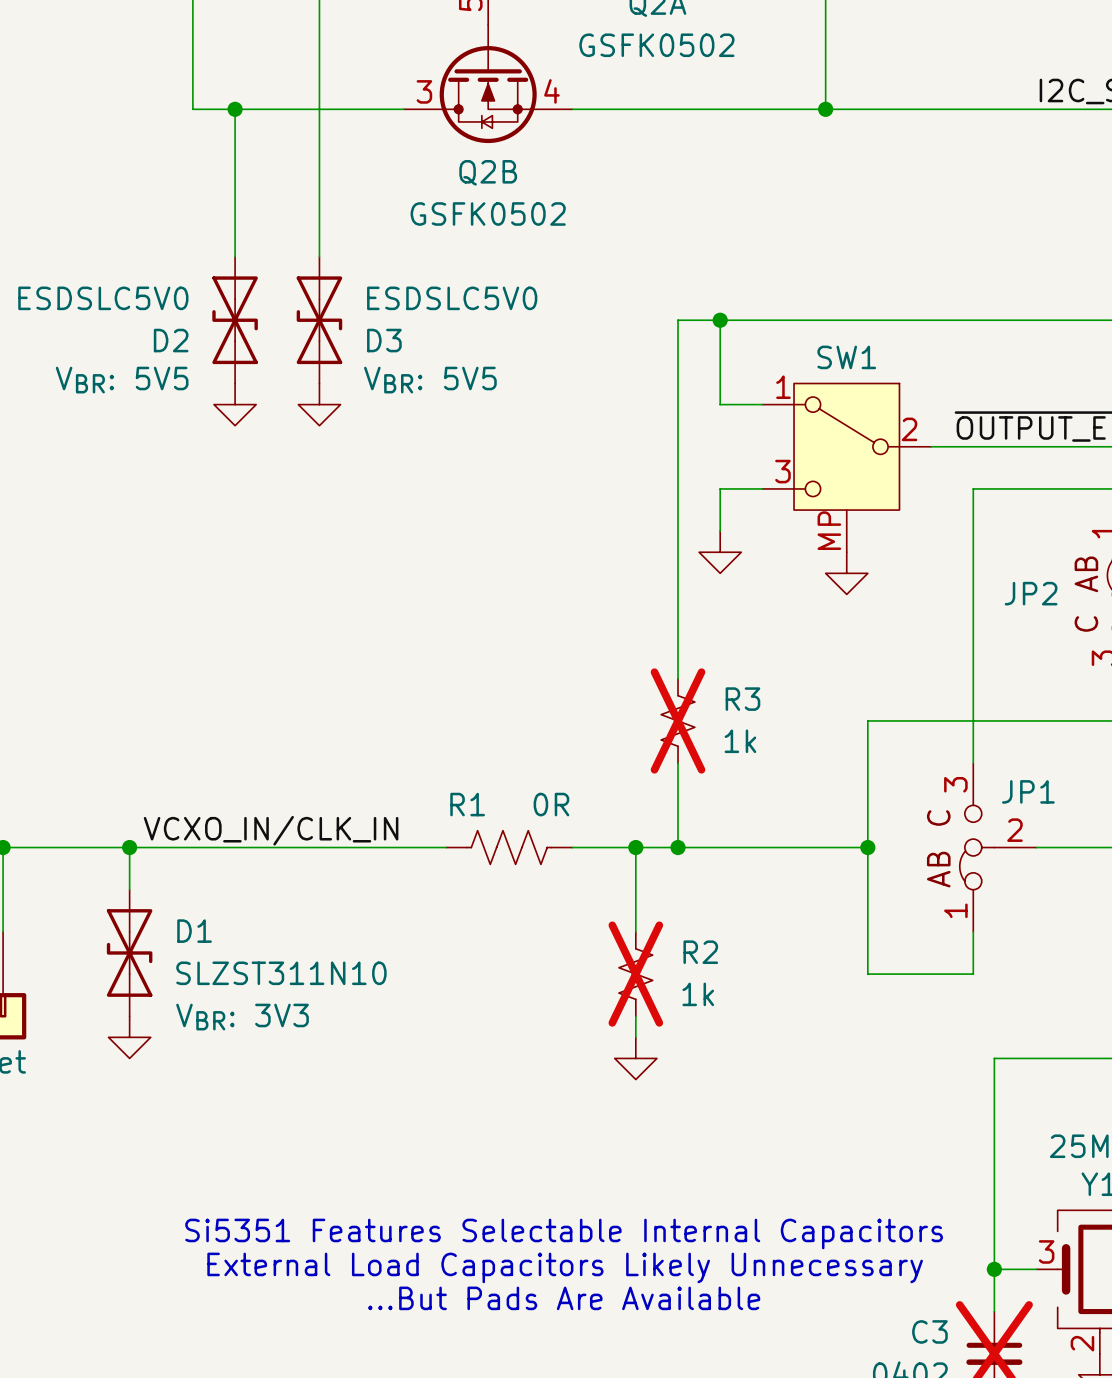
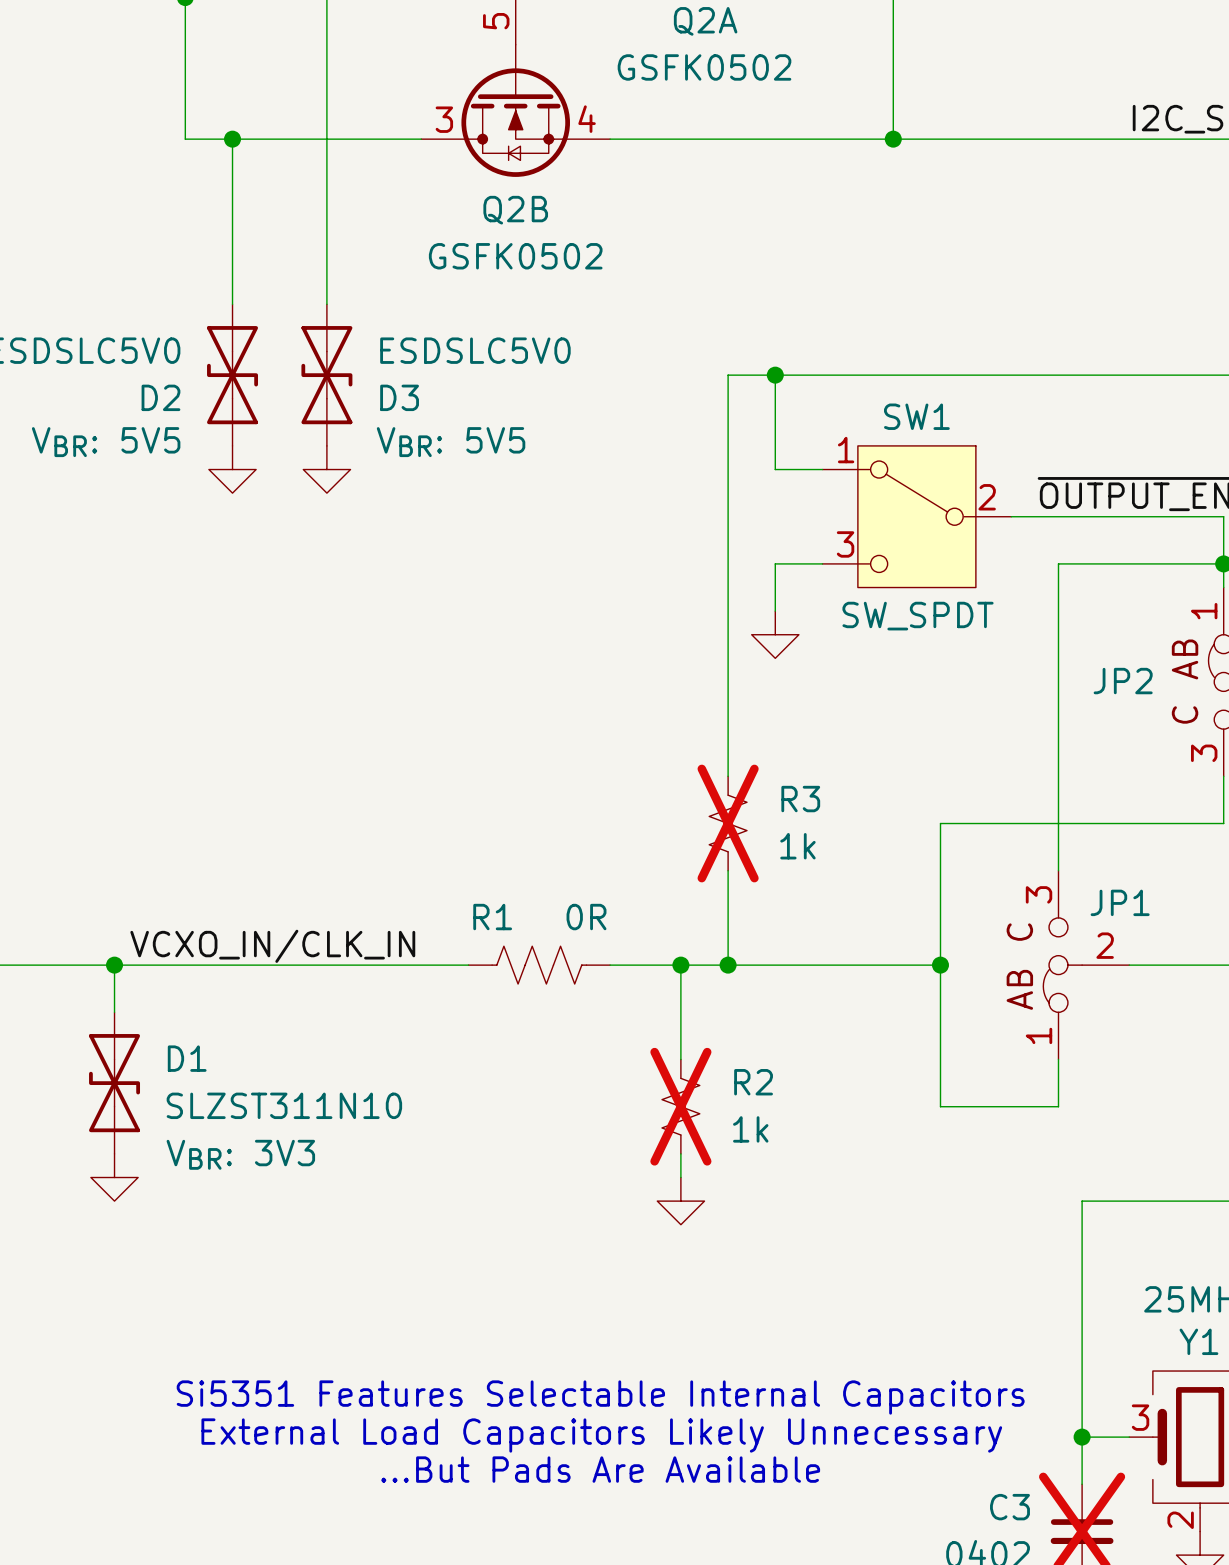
SW1 symbol: [762, 383, 932, 553] -> [822, 445, 1012, 588]
SW1 value: none -> SW_SPDT (918, 616)
power symbol: (846, 573) -> none

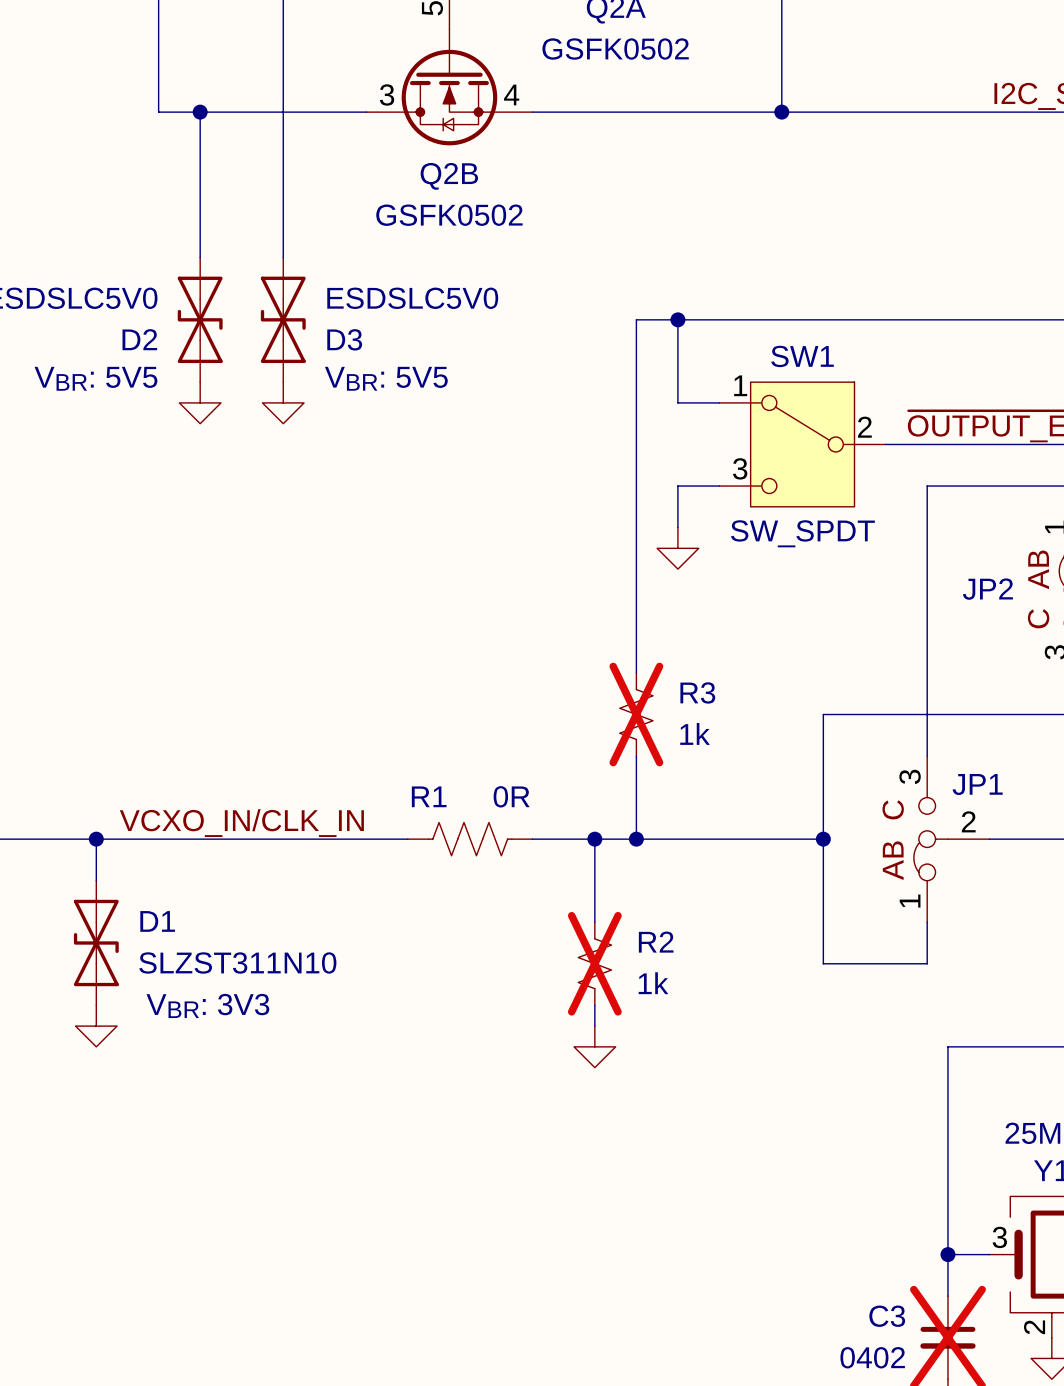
text: Si5351 Features Selectable Internal Capacitors (600, 1397) -> none
text: External Load Capacitors Likely Unnecessary (601, 1435) -> none
text: ...But Pads Are Available (600, 1469) -> none

